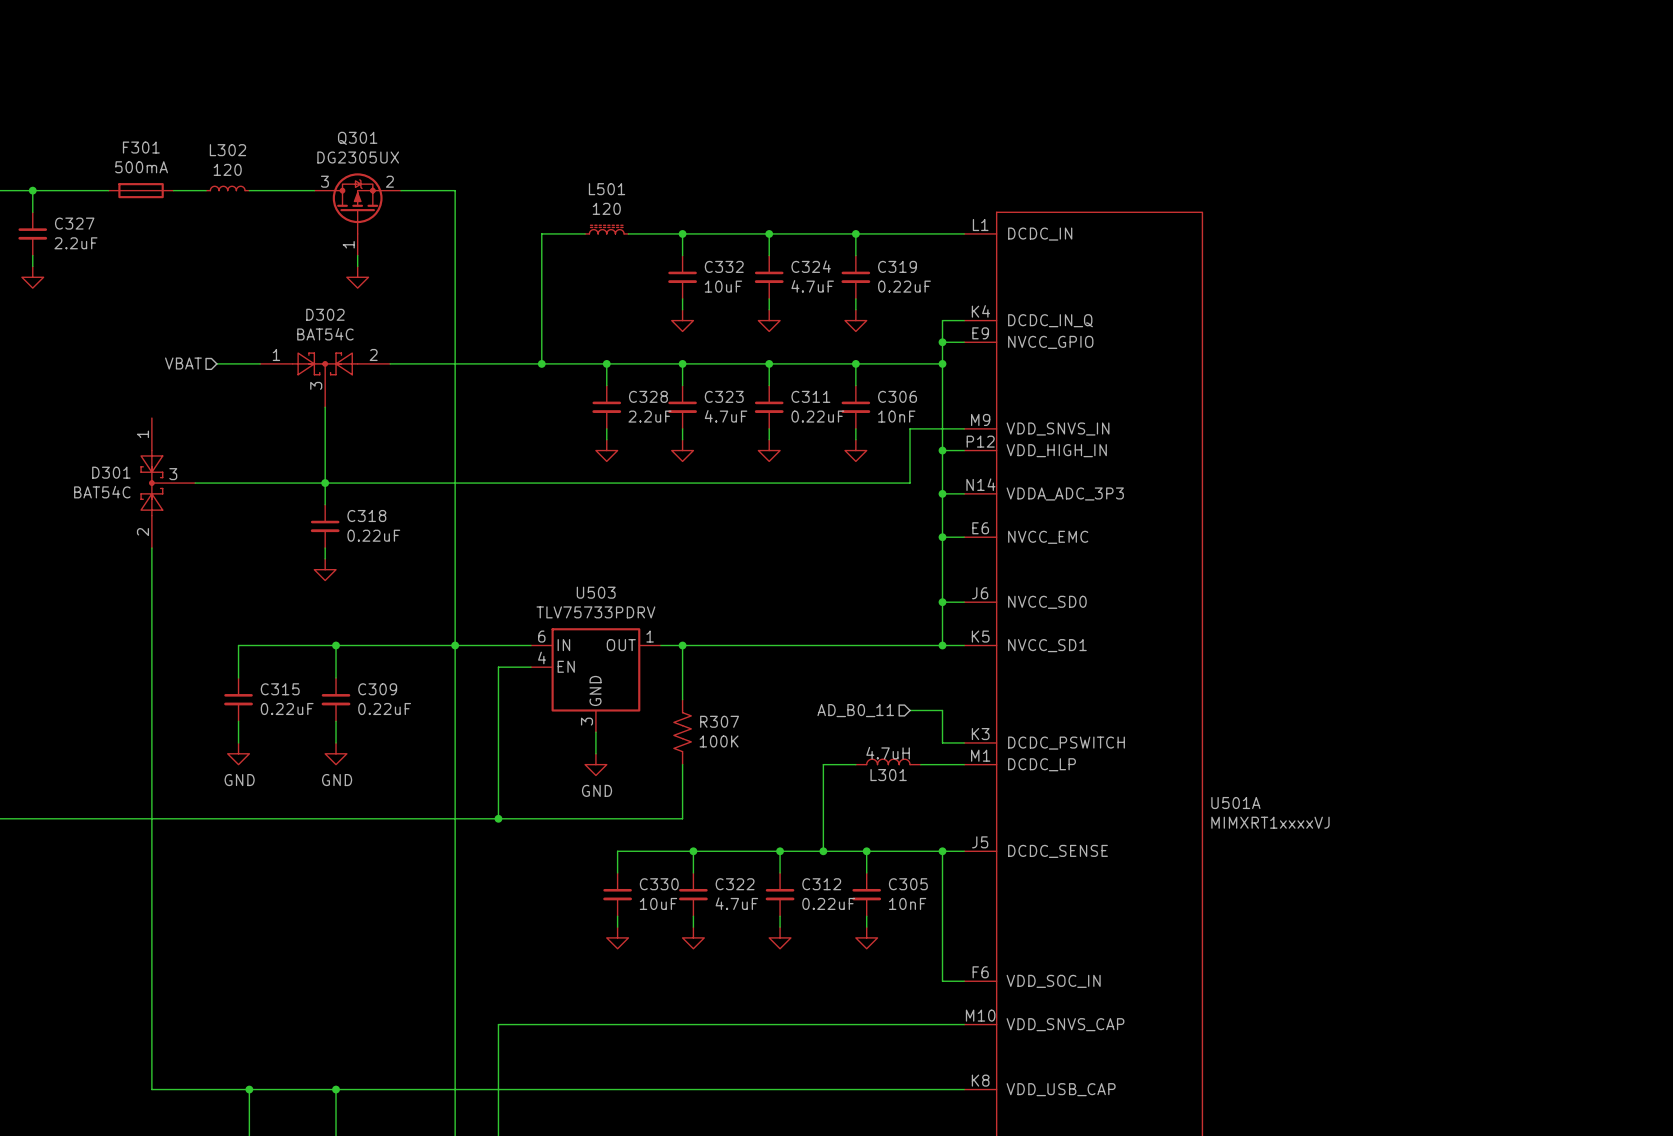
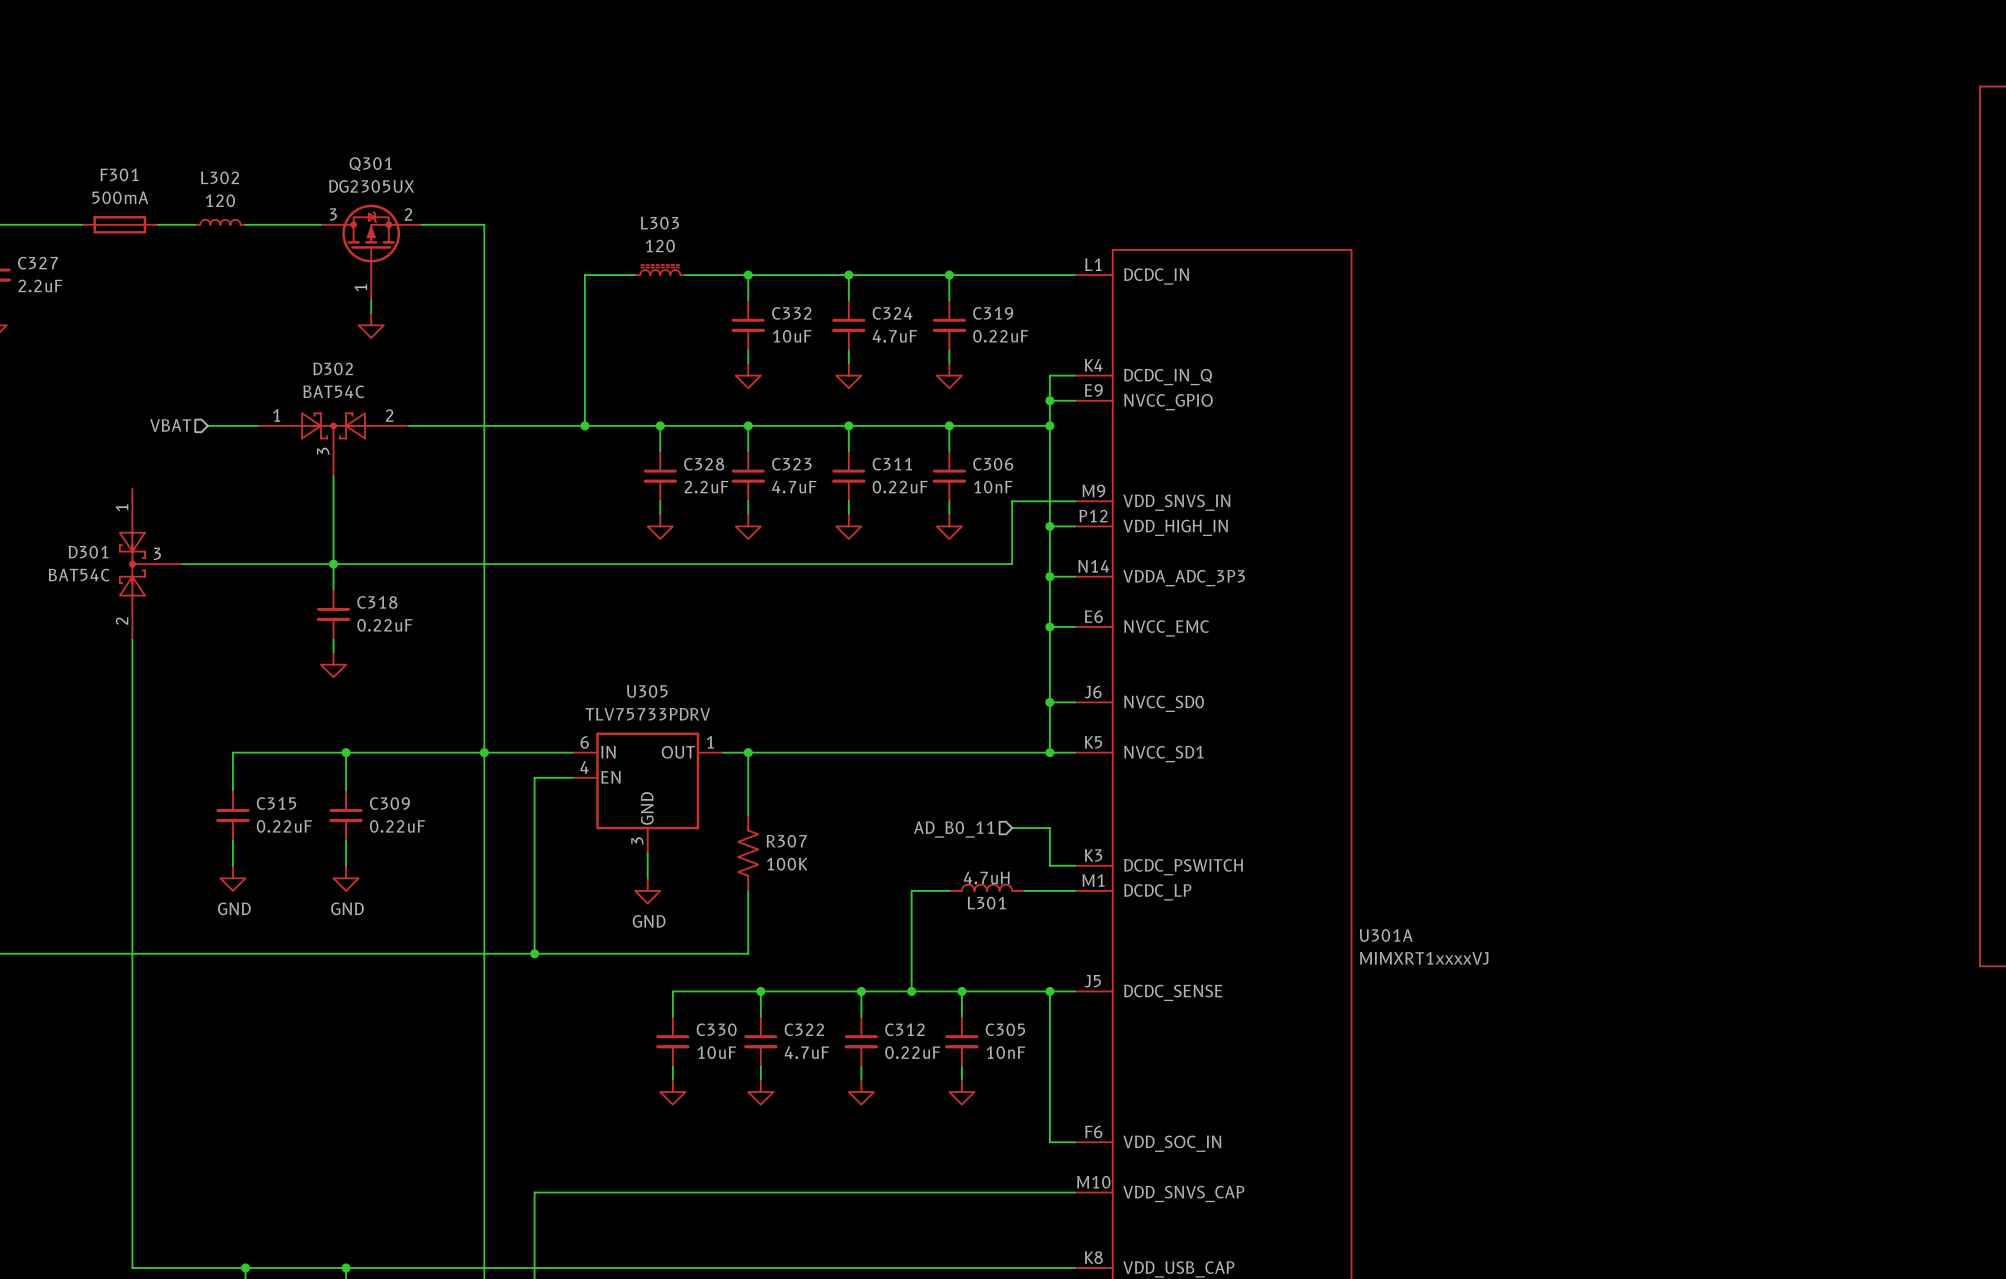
L501 name: L501 (607, 189) -> L303 (659, 223)
U503 name: U503 (596, 592) -> U305 (647, 691)
U501A name: U501A (1235, 803) -> U301A (1386, 935)

